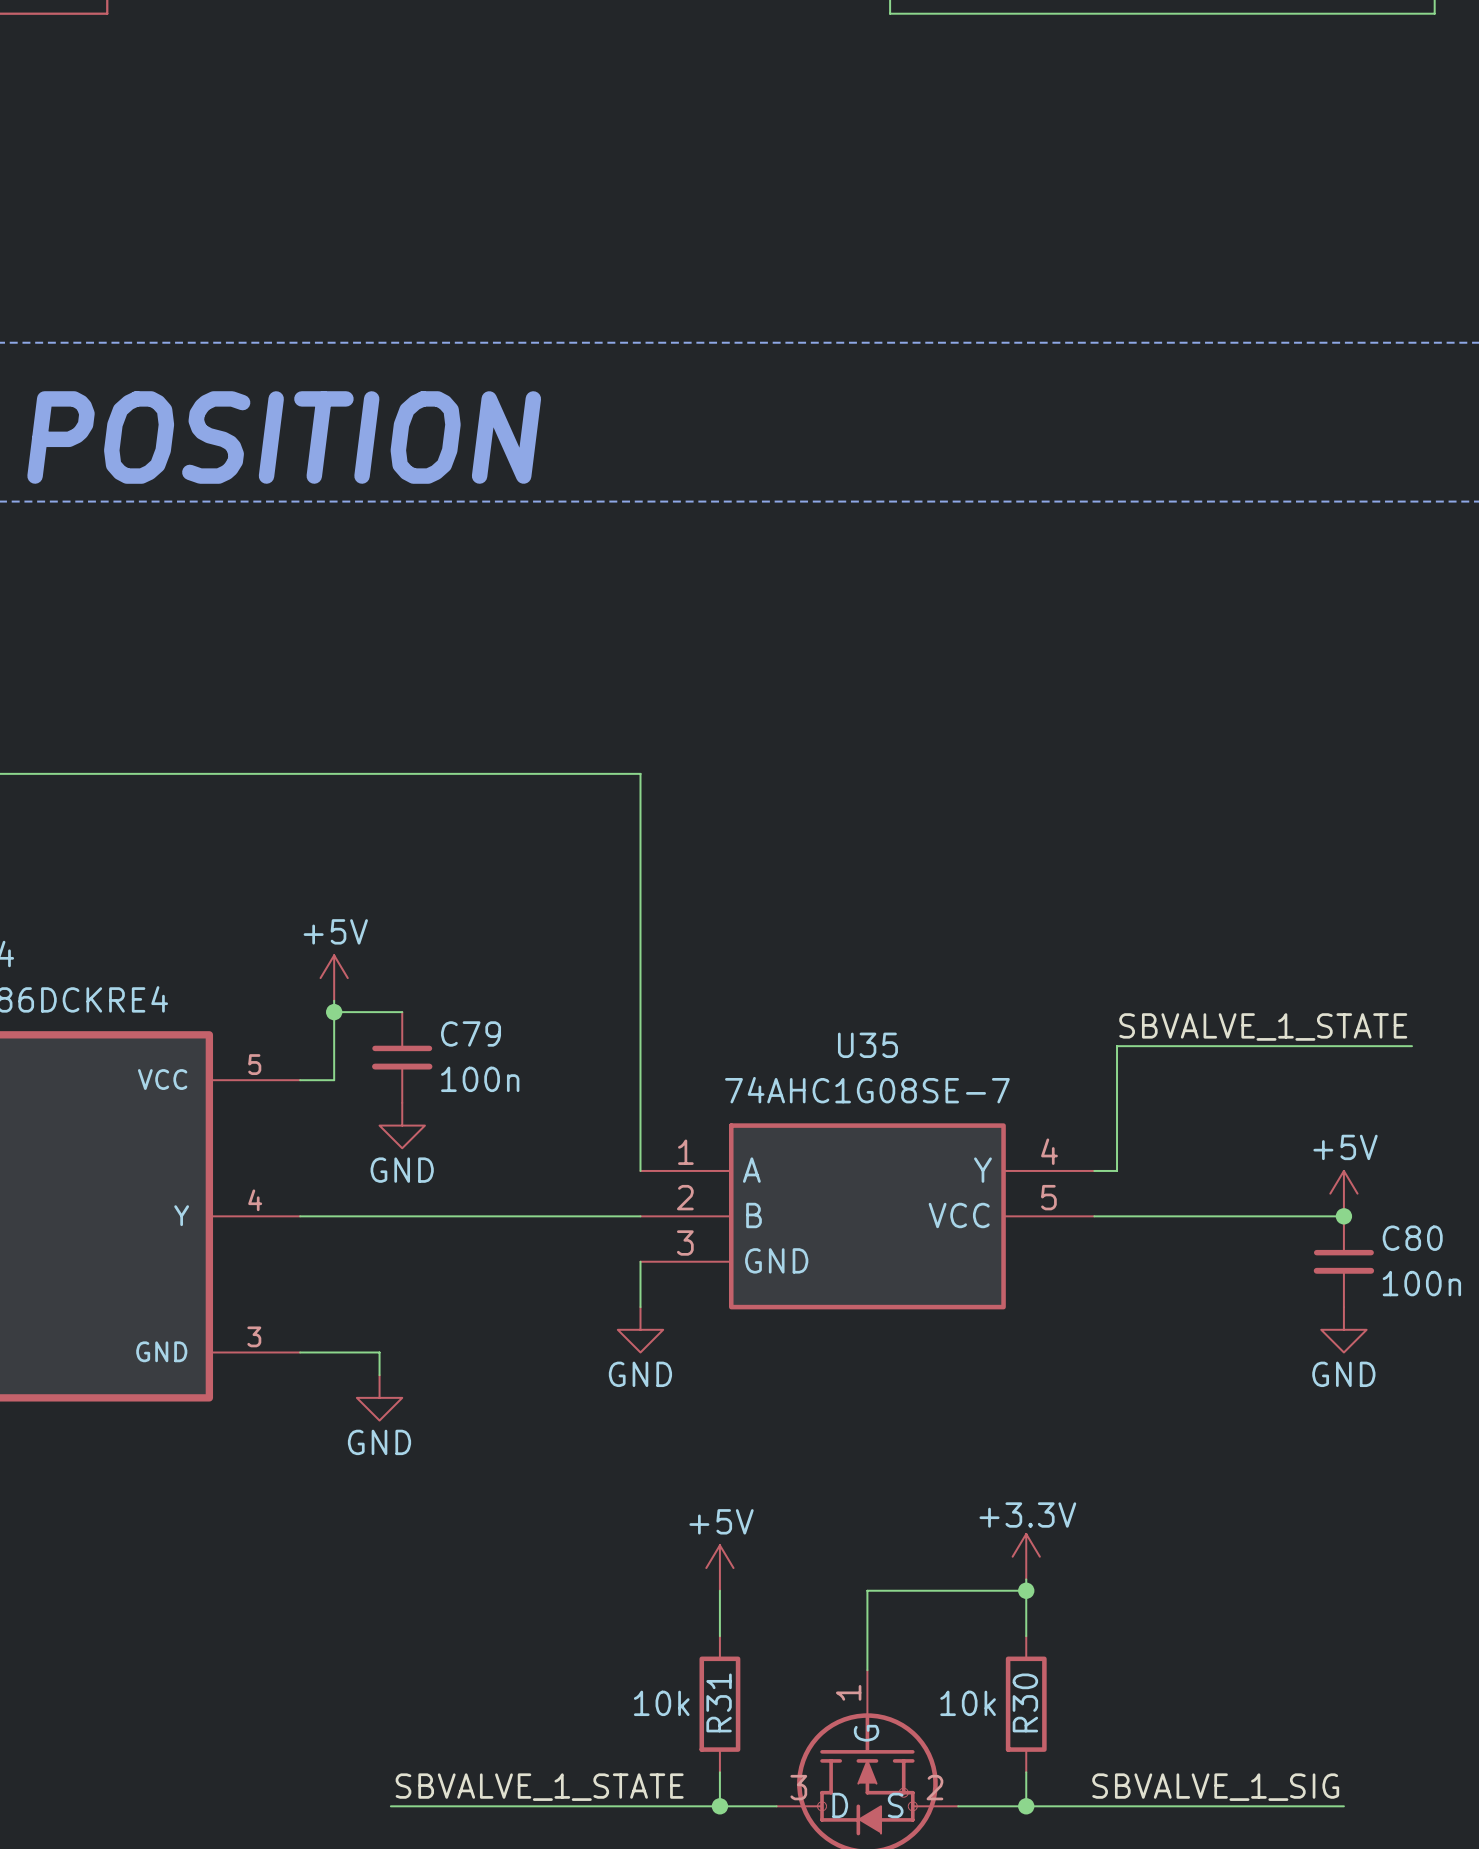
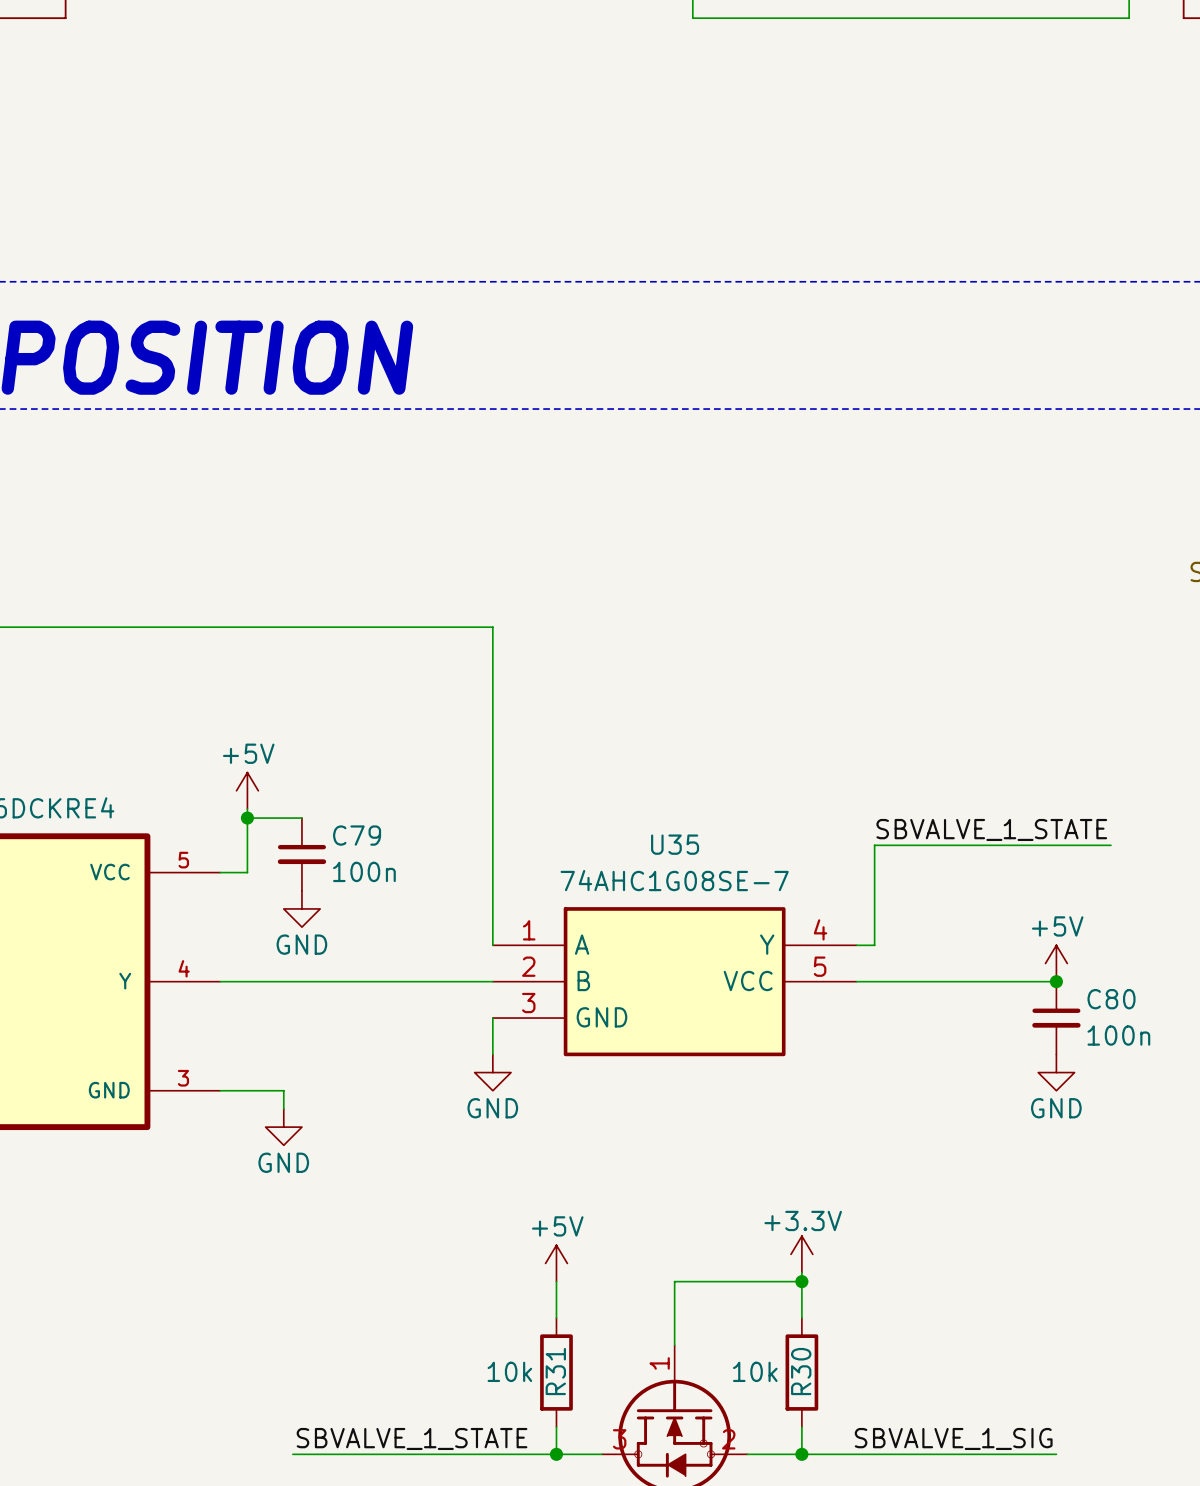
part pin name: G (866, 1733) -> none
part pin name: D (840, 1805) -> none
part pin name: S (895, 1805) -> none

